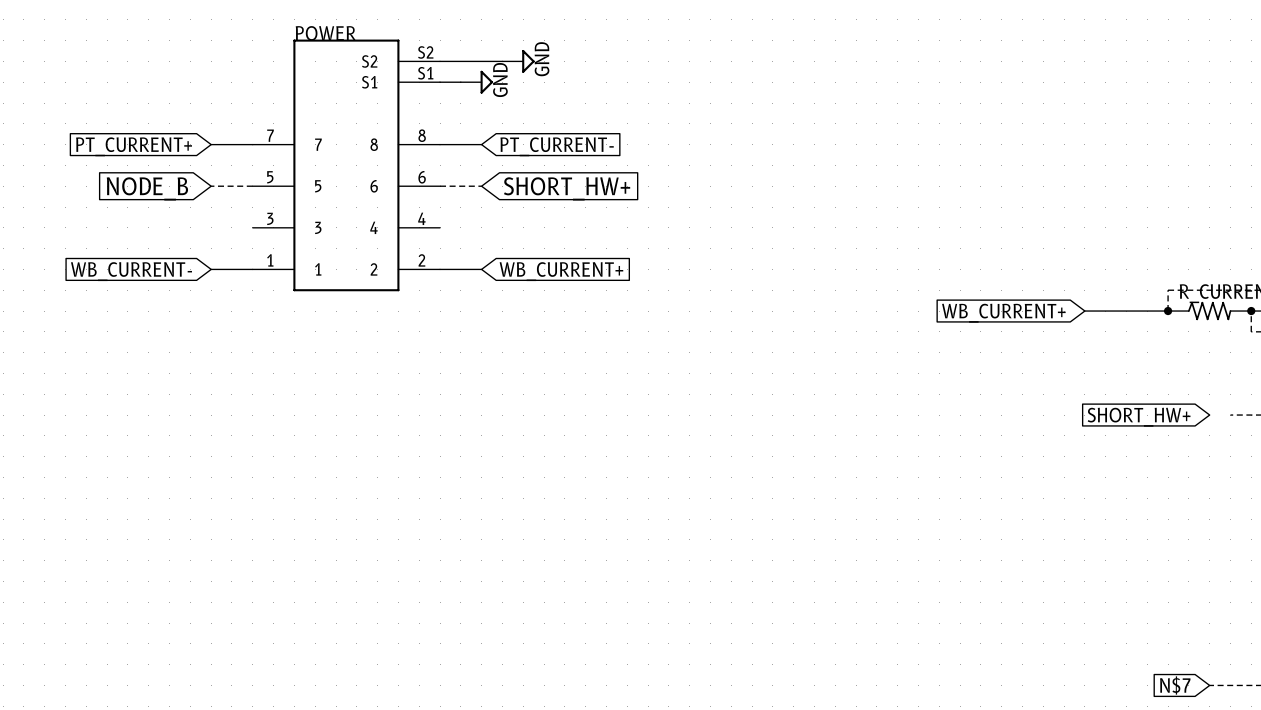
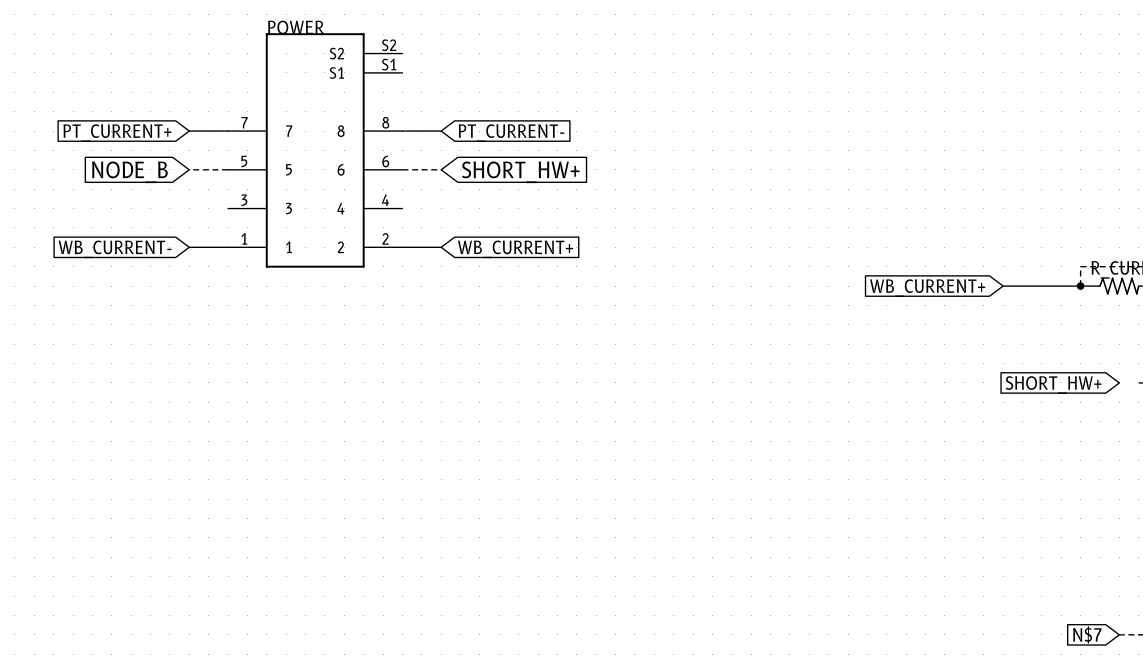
wire: (440, 61) (502, 61) -> none
power symbol: GND (518, 61) -> none
wire: (440, 82) (460, 82) -> none
power symbol: GND (476, 82) -> none

